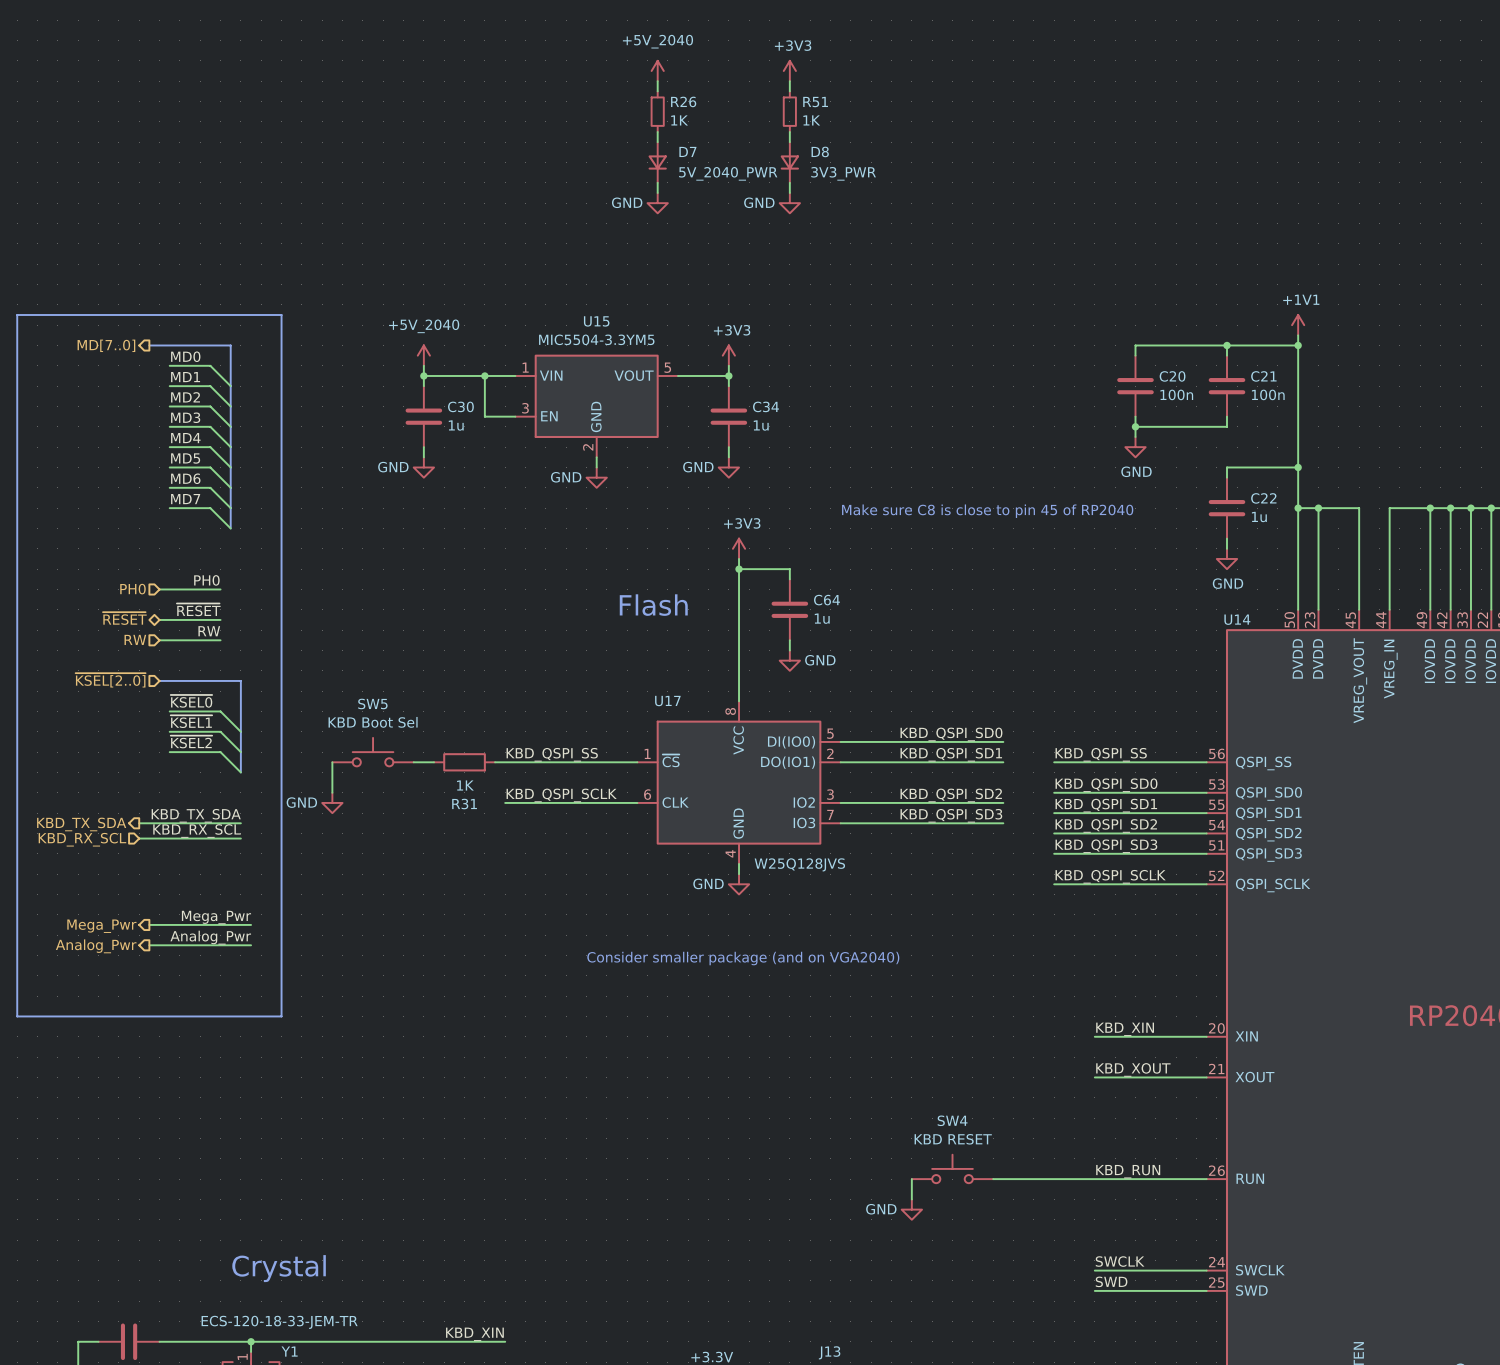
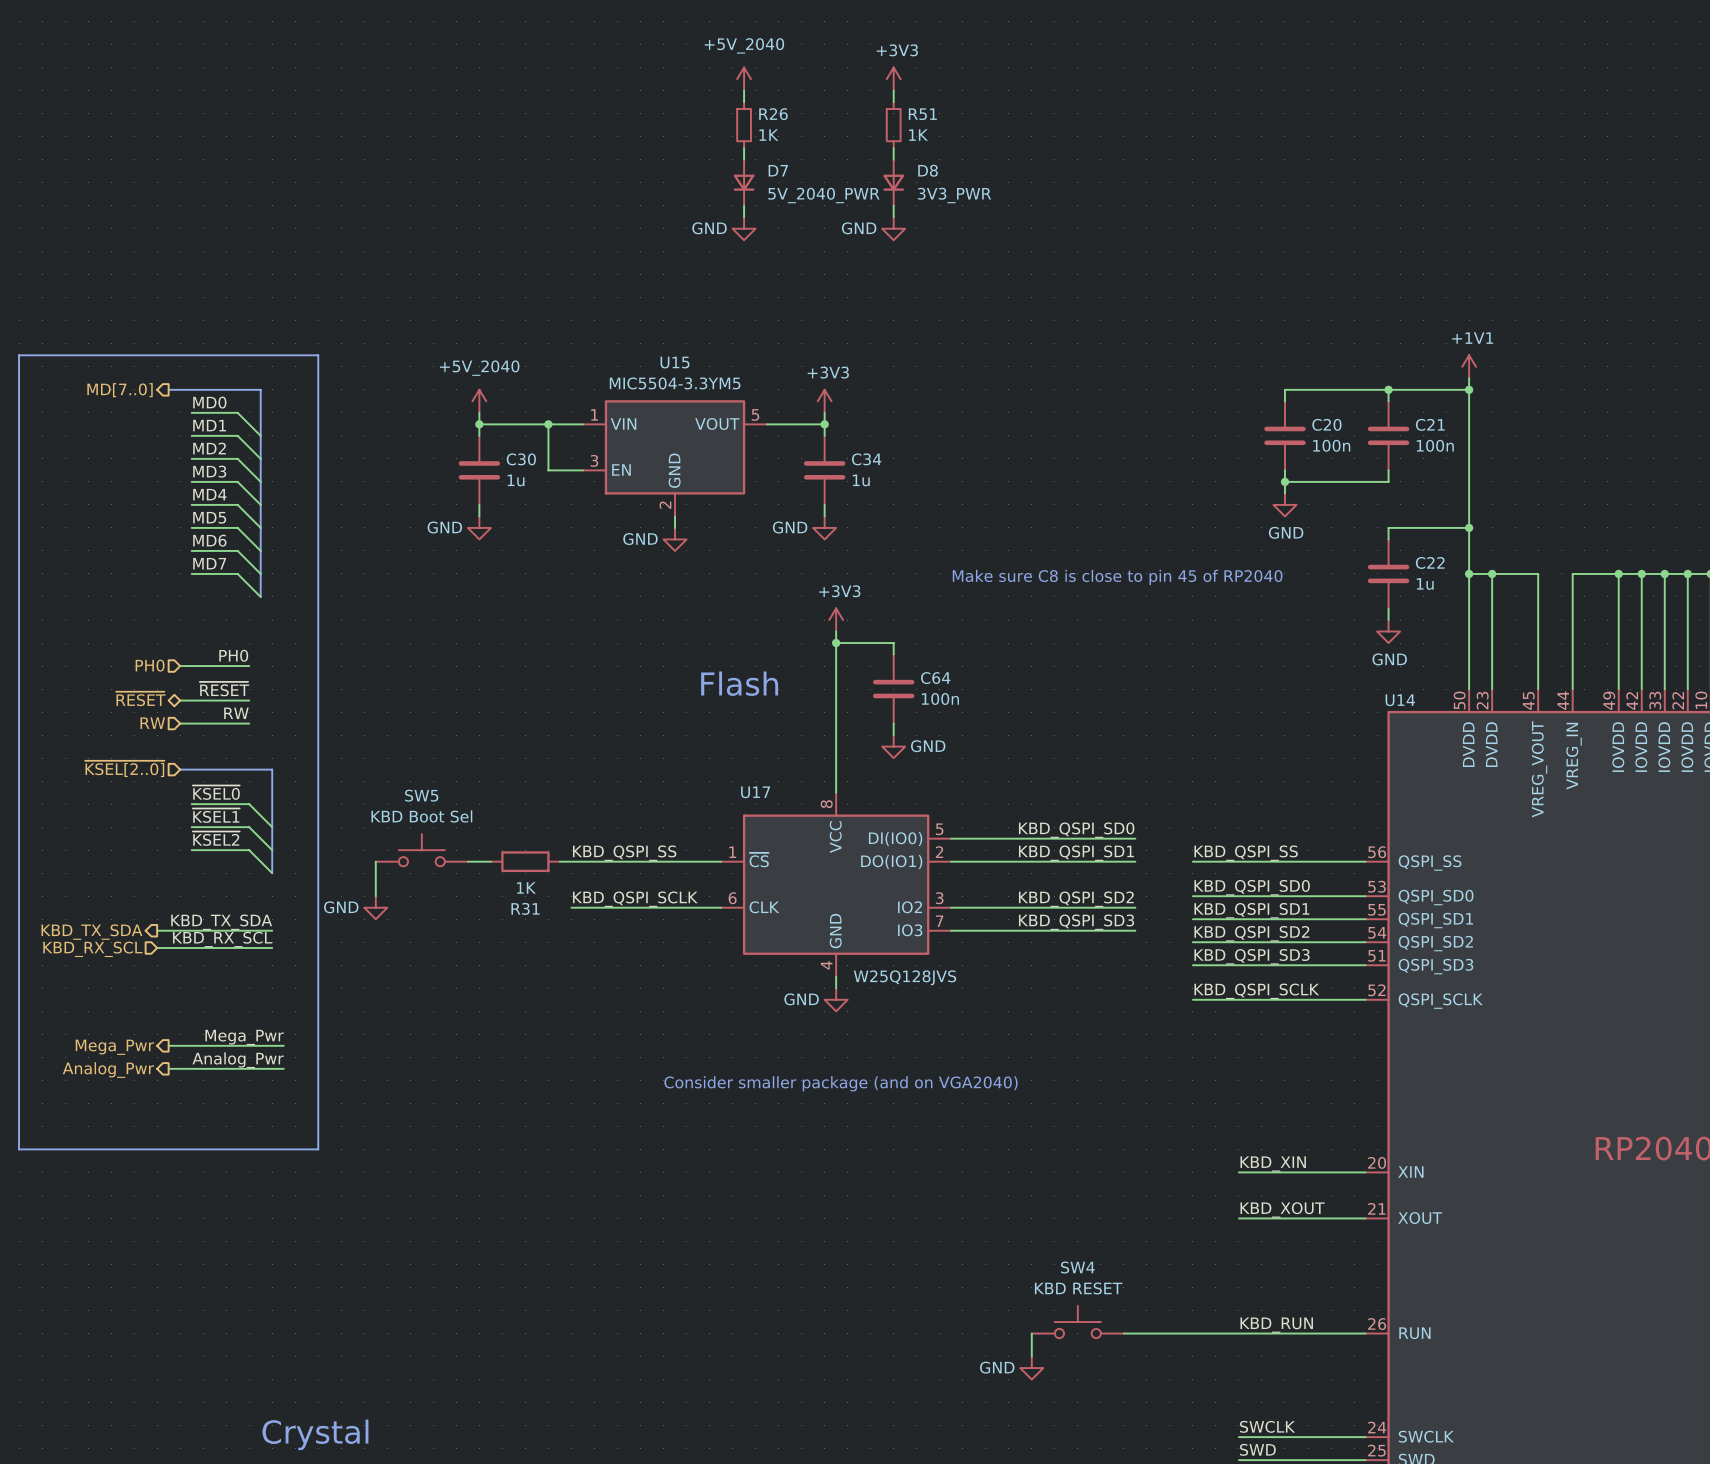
C64 value: 1u (822, 618) -> 100n (940, 698)

